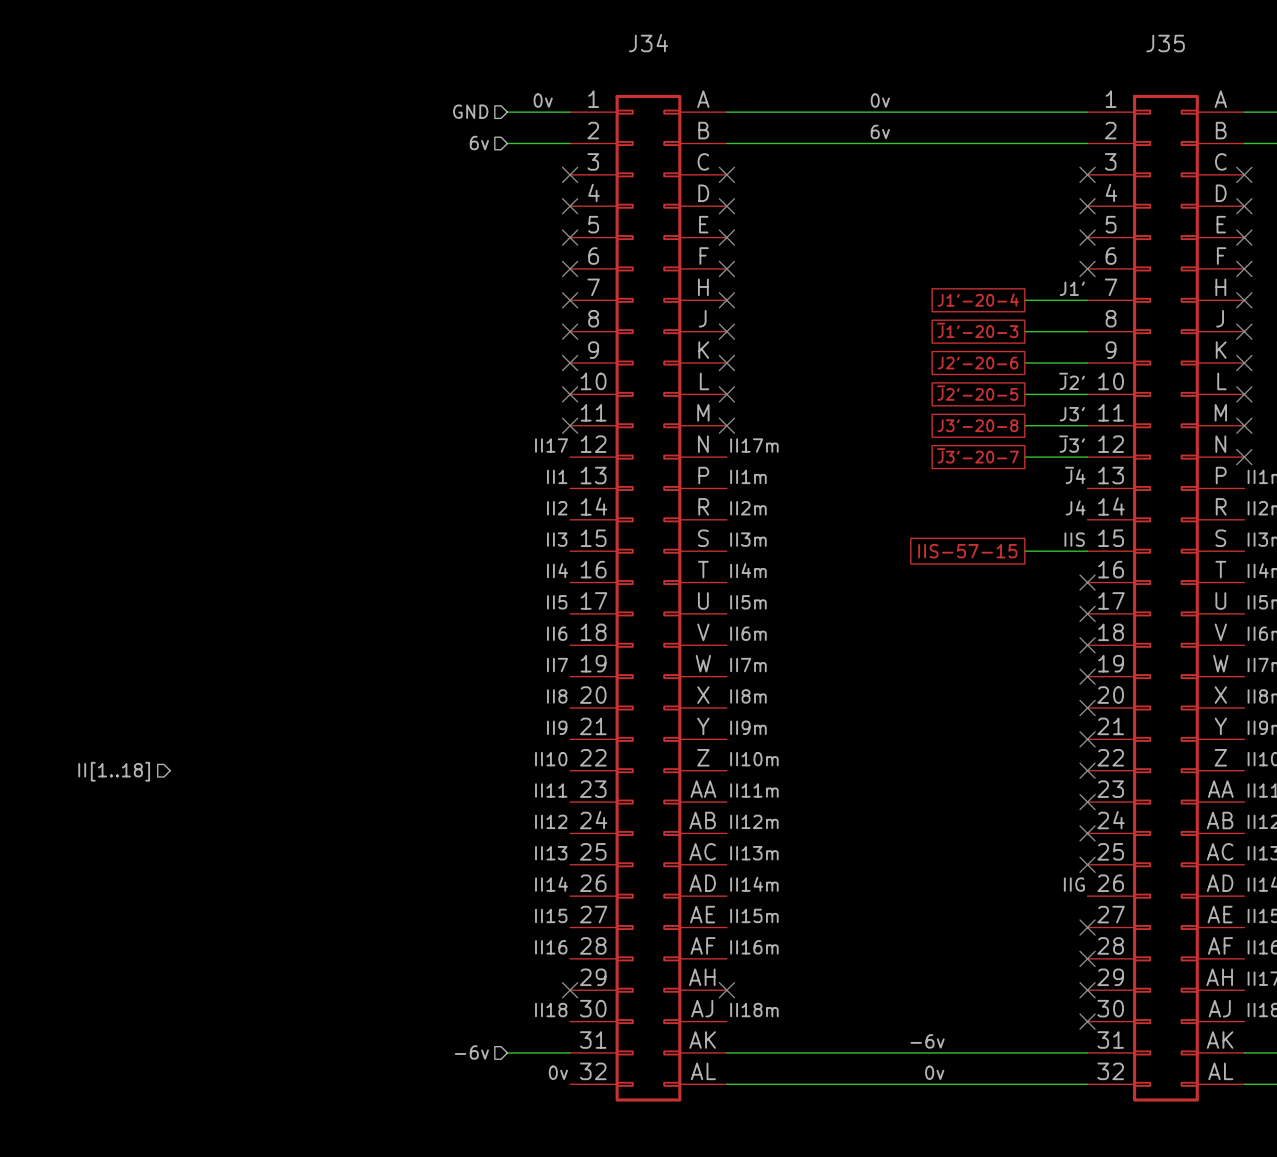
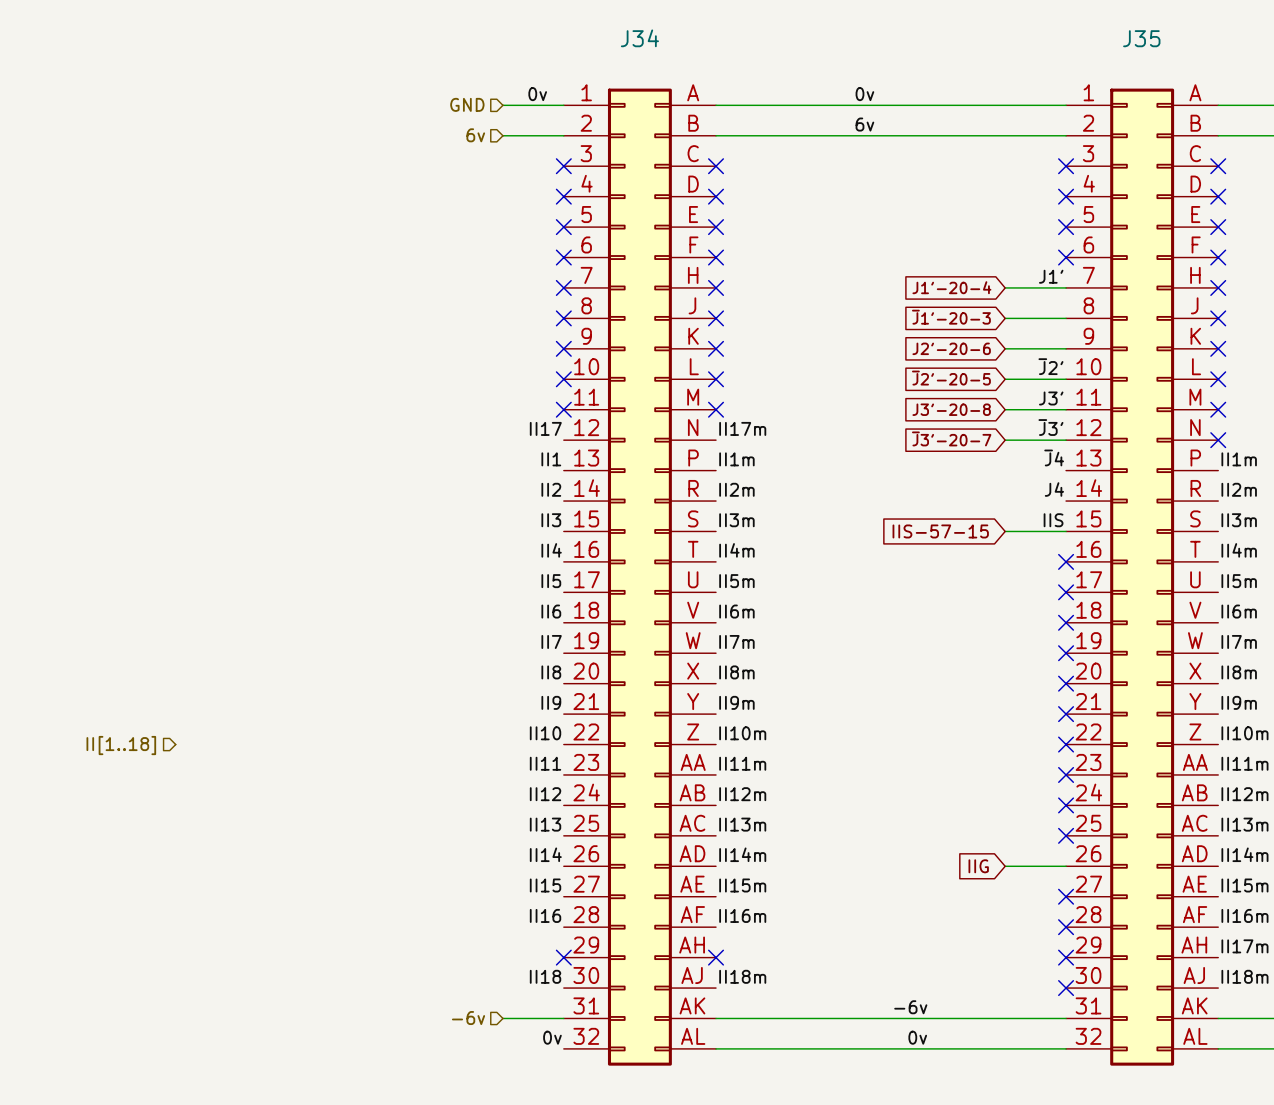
global label shape: passive (978, 300) -> input (951, 287)
global label shape: passive (977, 330) -> input (951, 317)
global label shape: passive (977, 363) -> input (951, 348)
global label shape: passive (977, 393) -> input (951, 378)
global label shape: passive (977, 425) -> input (951, 409)
global label shape: passive (977, 455) -> input (951, 438)
global label shape: passive (967, 551) -> input (940, 531)
label: IIG (1074, 884) -> none
global label: none -> IIG (978, 866)
wire: none -> (1005, 866) (1066, 866)

